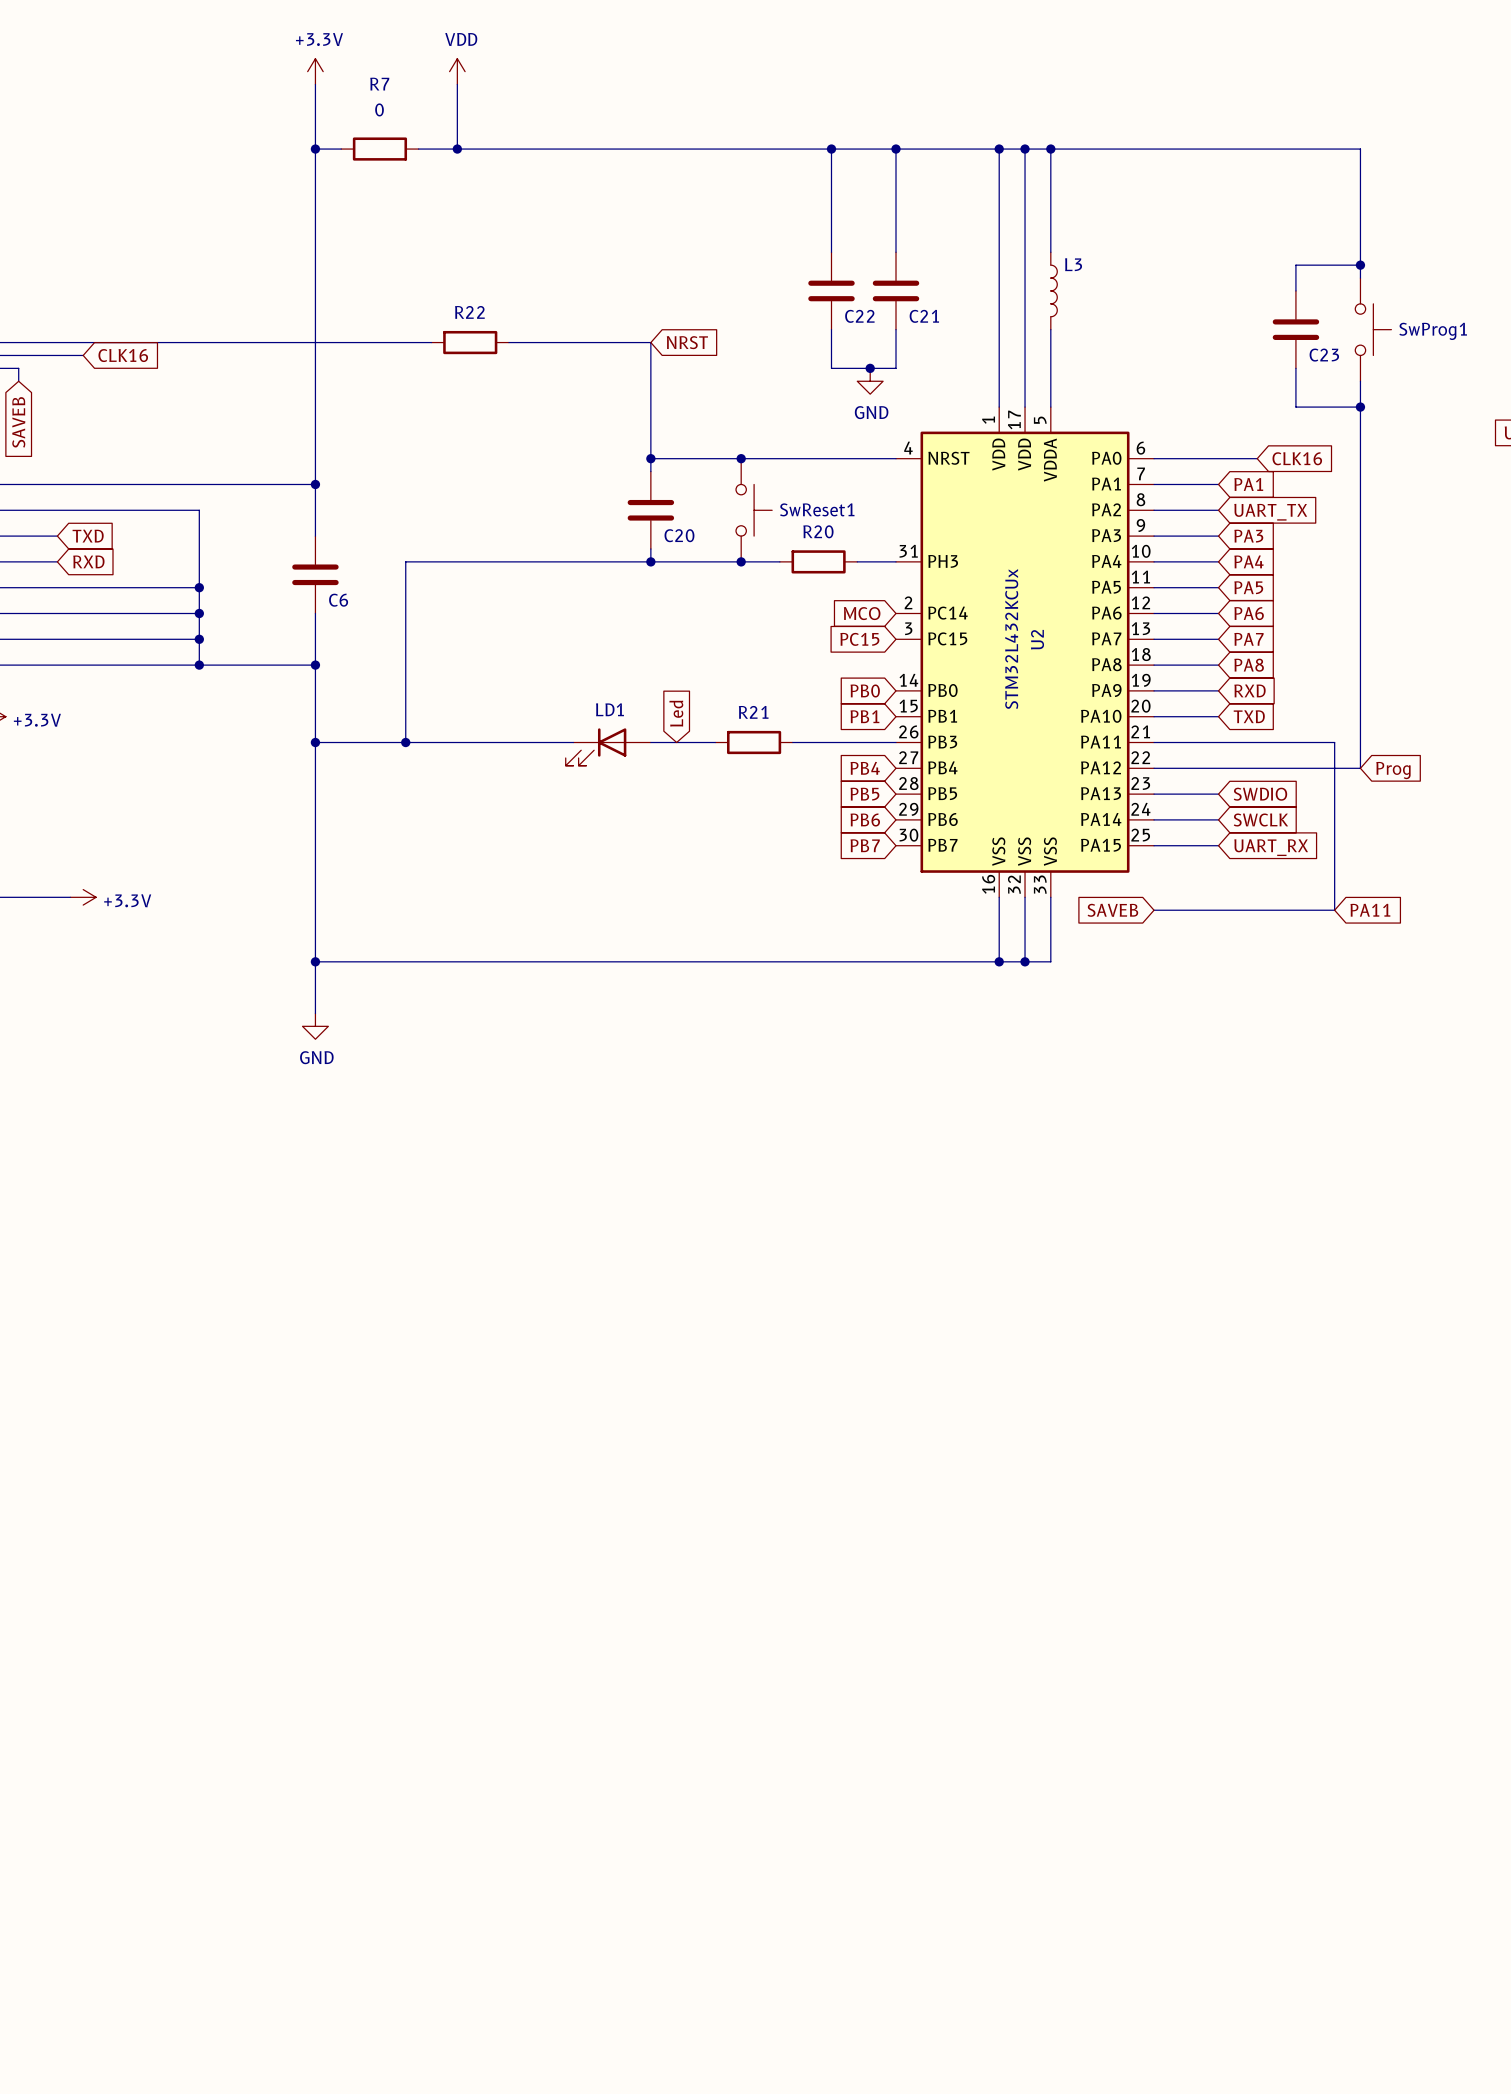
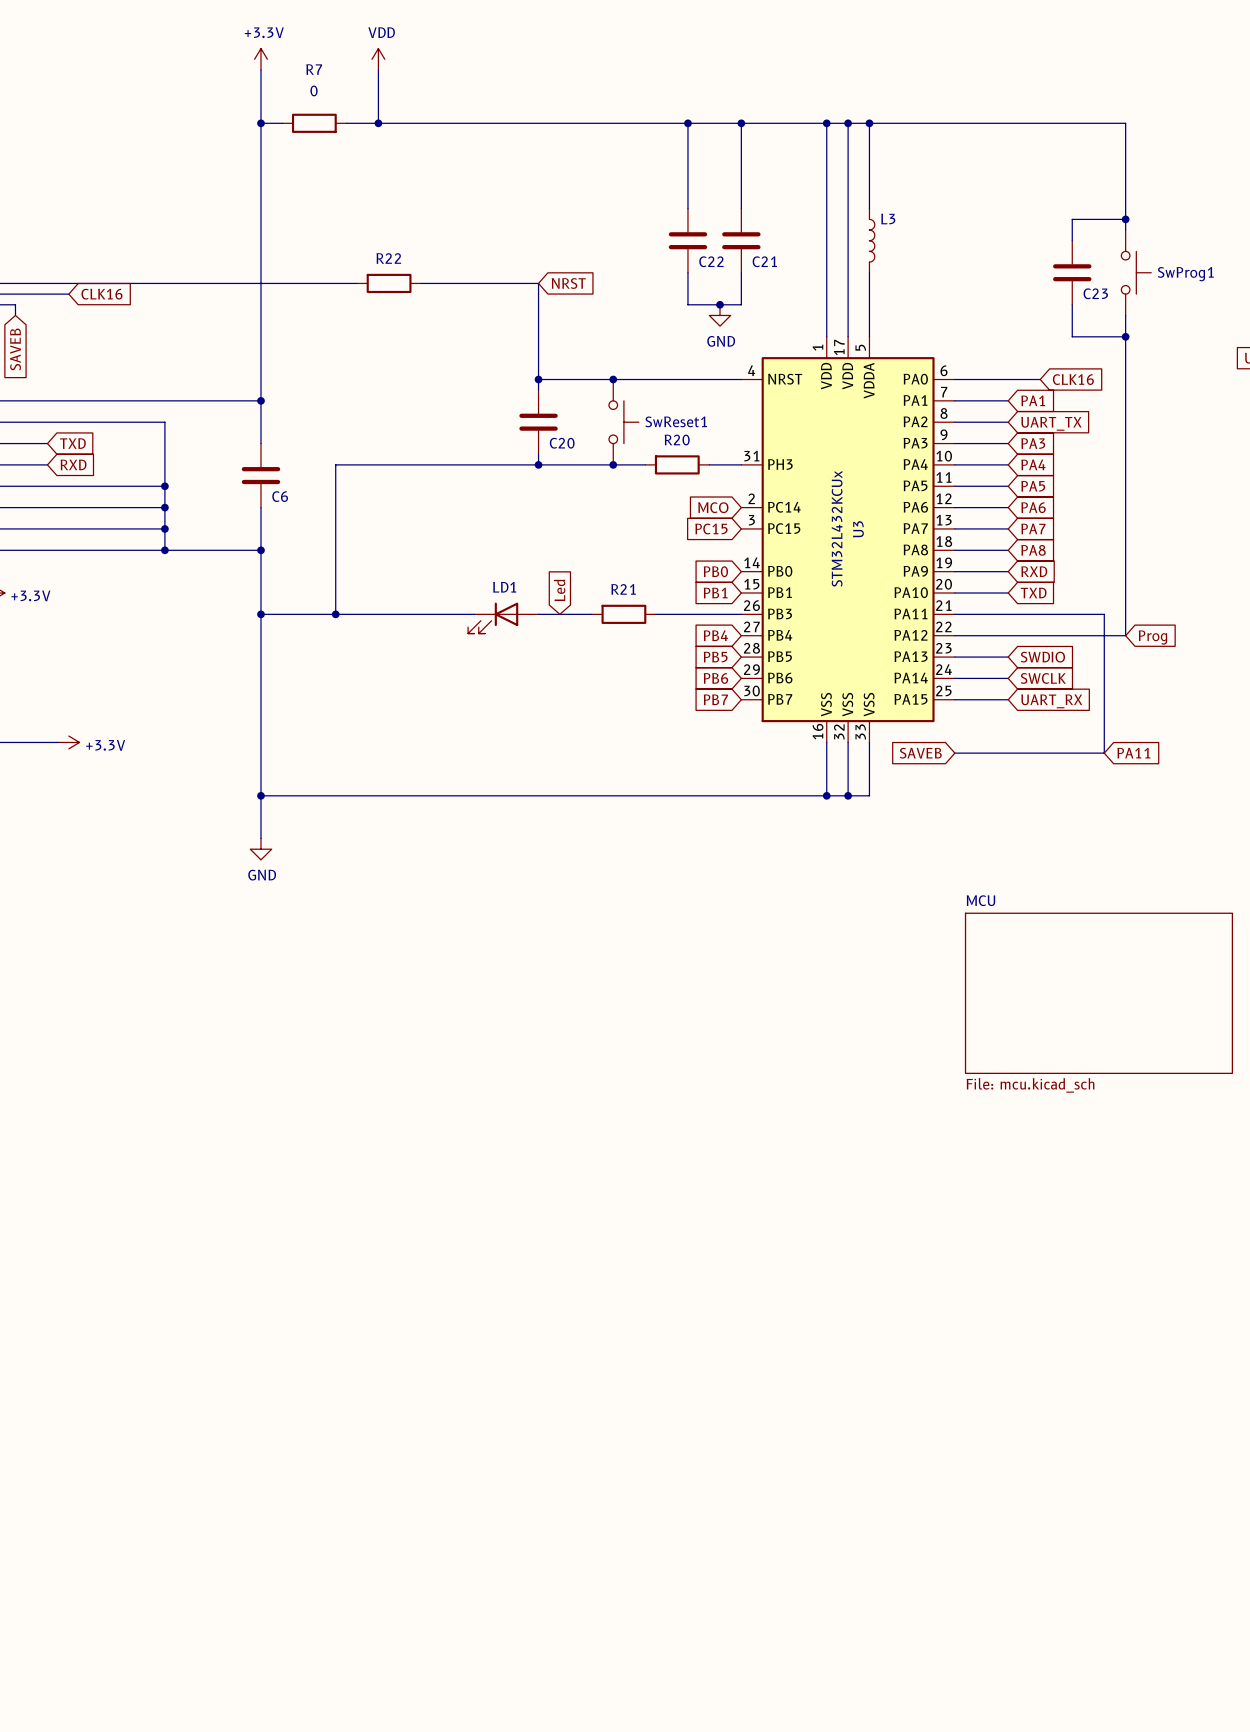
U2 name: U2 (1037, 639) -> U3 (858, 529)
sheet MCU: none -> File: mcu.kicad_sch (1098, 993)

